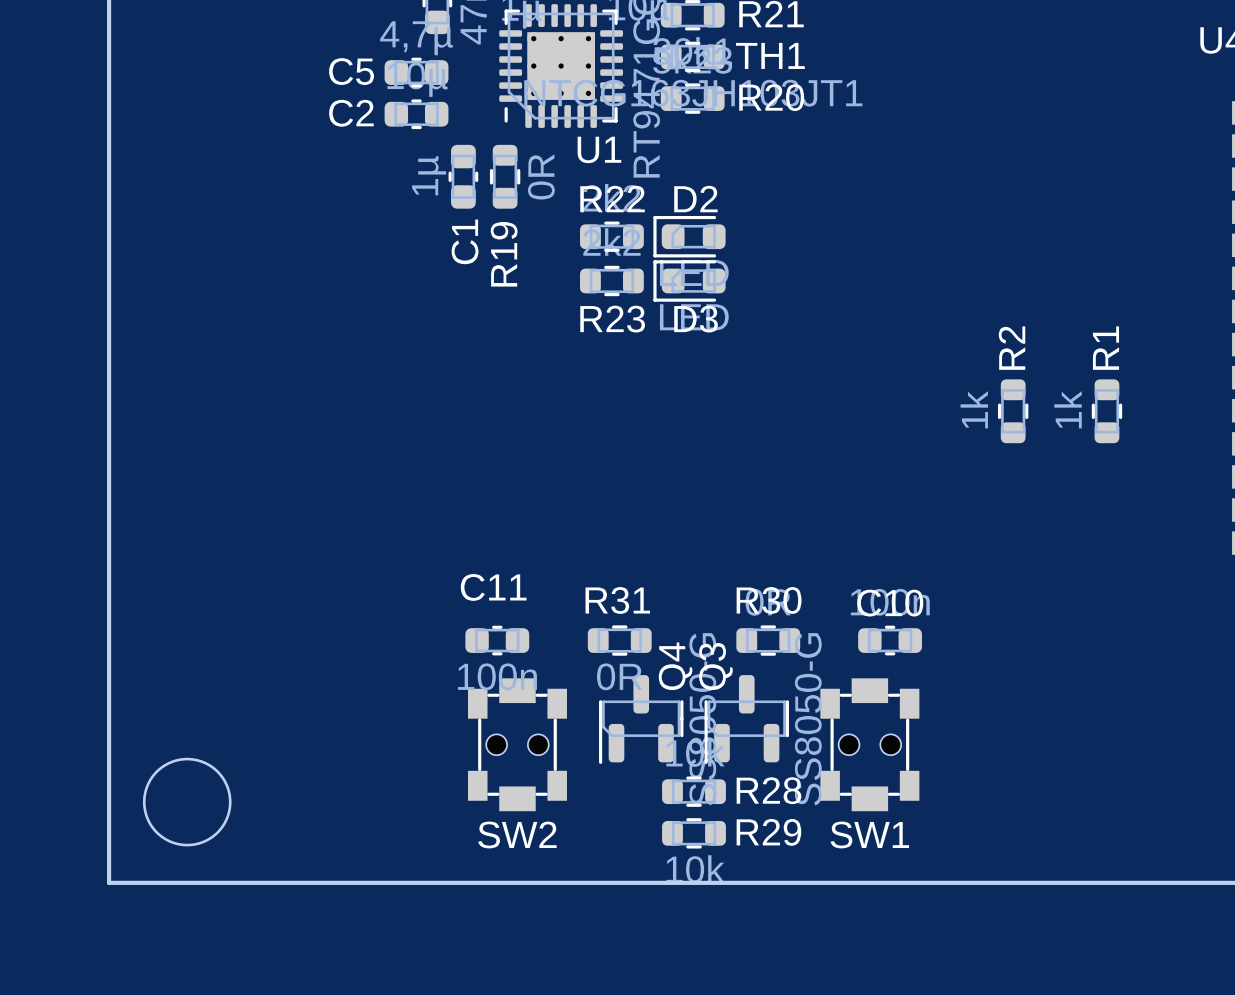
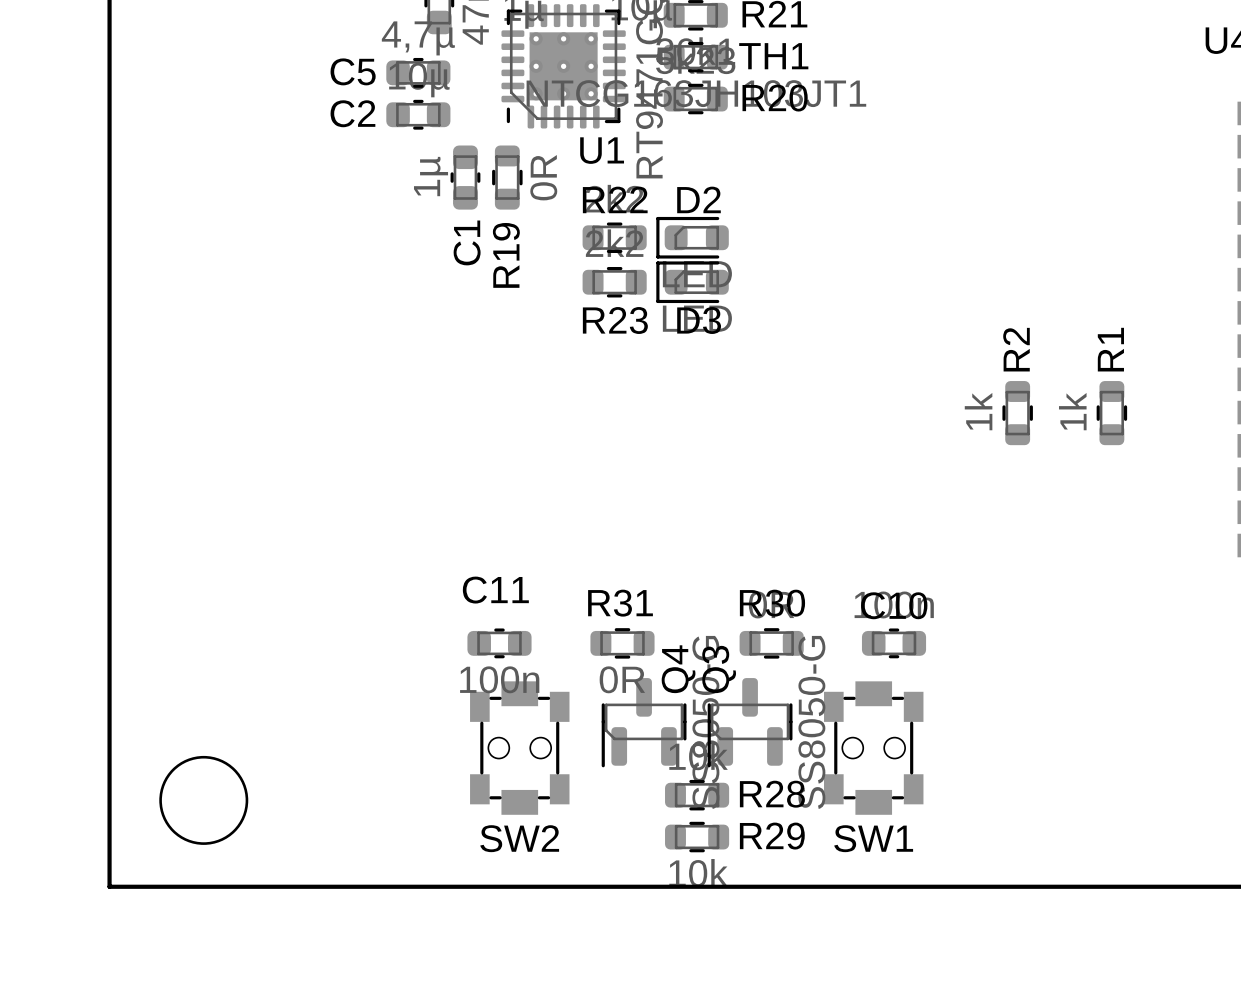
round board edge position: (187, 802) -> (203, 800)

